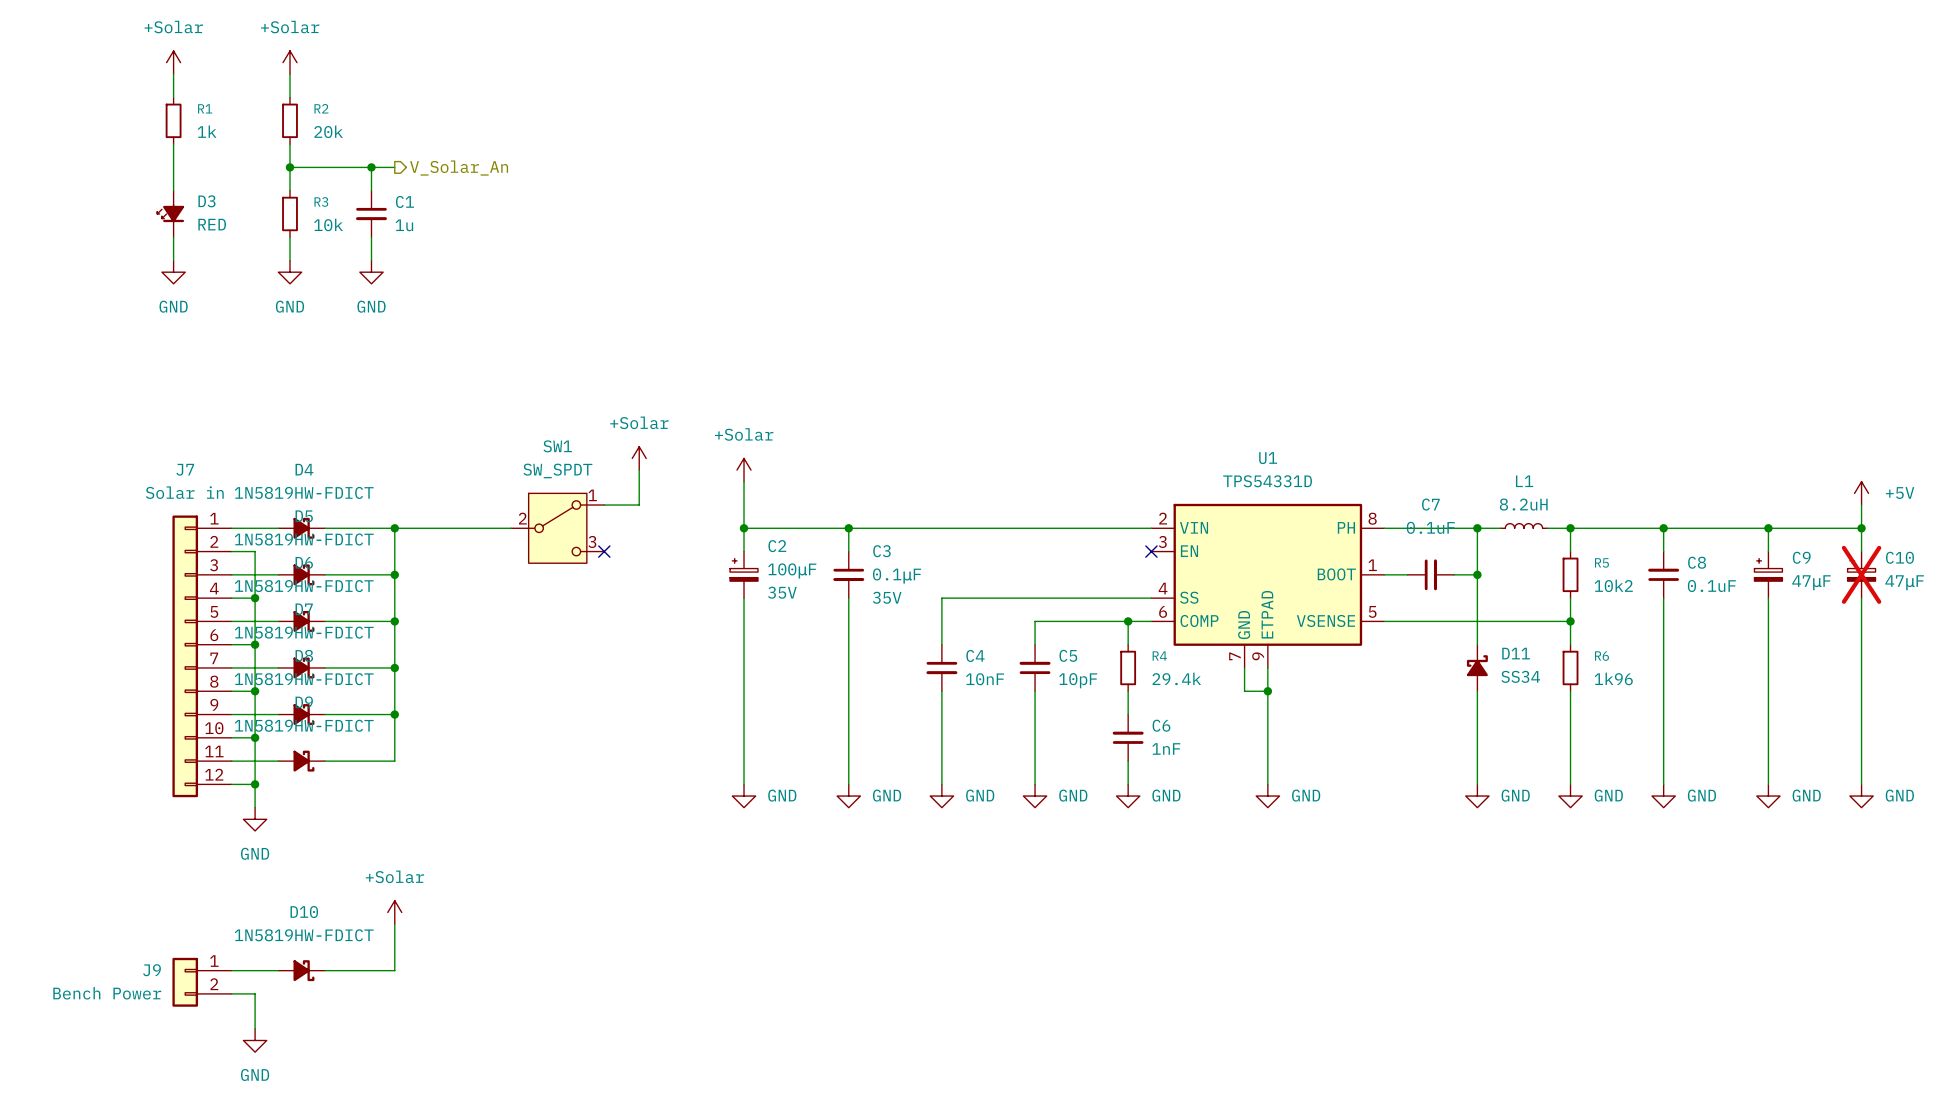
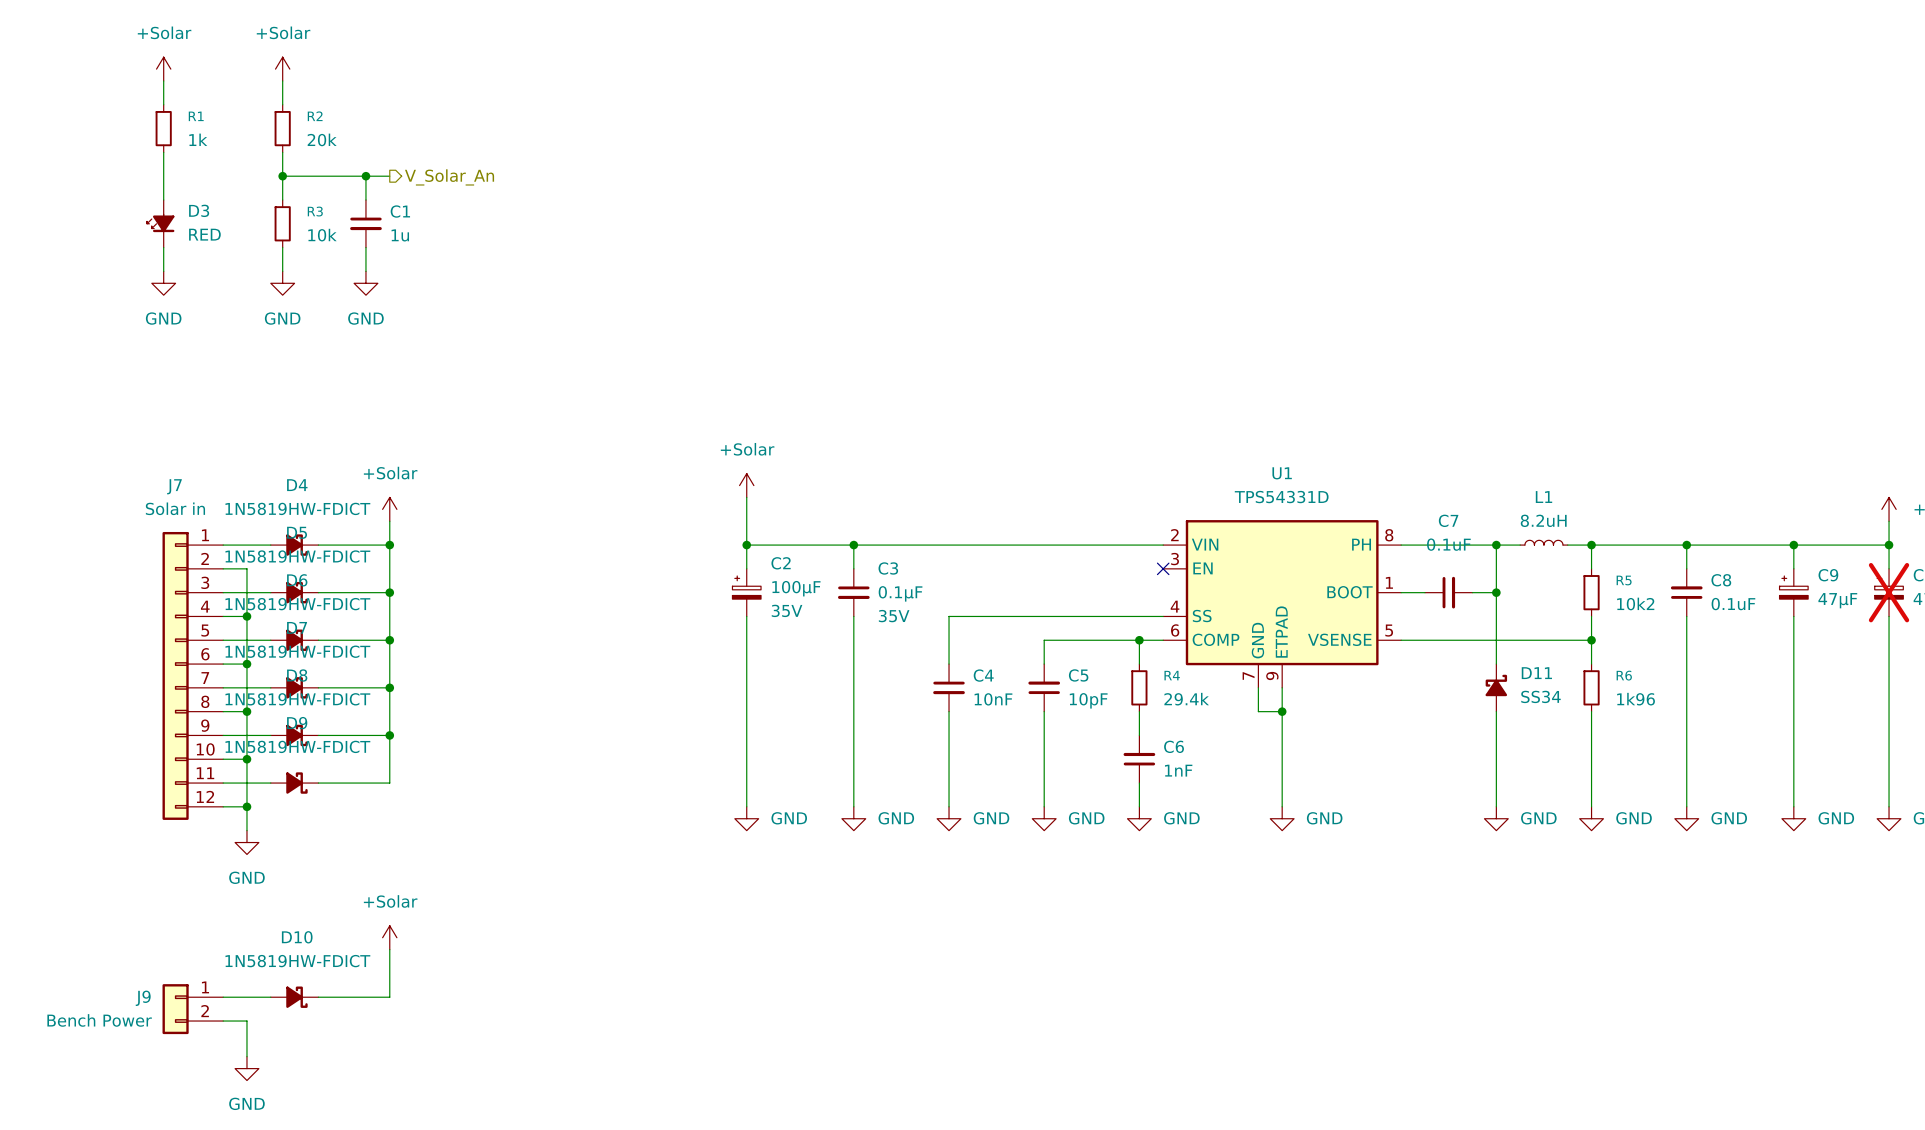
power symbol: +Solar (639, 458) -> none
wire: (639, 470) (639, 505) (604, 505) -> none
power symbol: none -> +Solar (389, 509)
wire: (394, 528) (511, 528) -> (389, 545) (389, 521)
SW1: SW_SPDT (557, 528) -> none
no-connect mark: (604, 551) -> none

